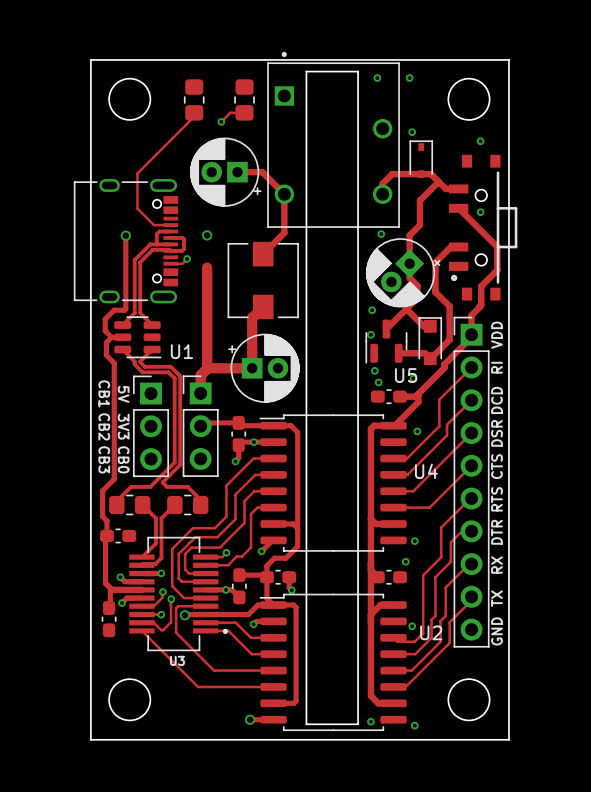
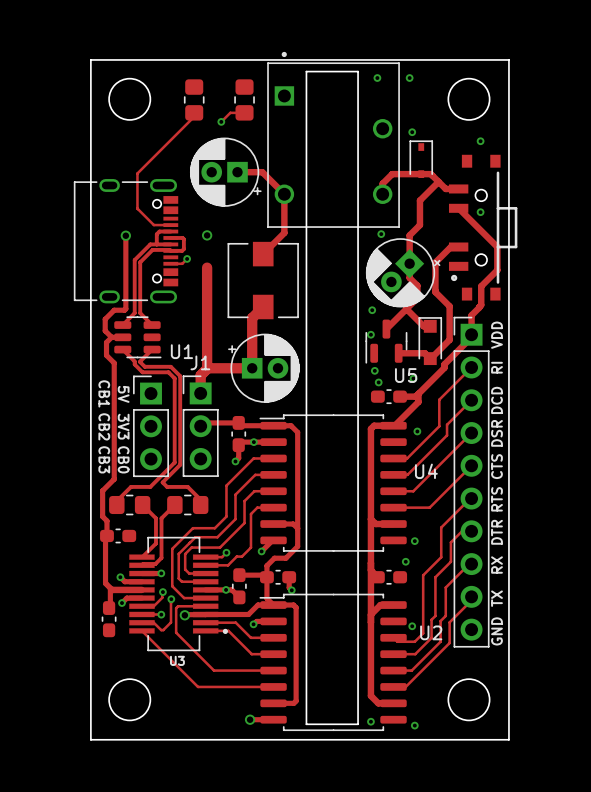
J1 name: none -> J1 (200, 362)

